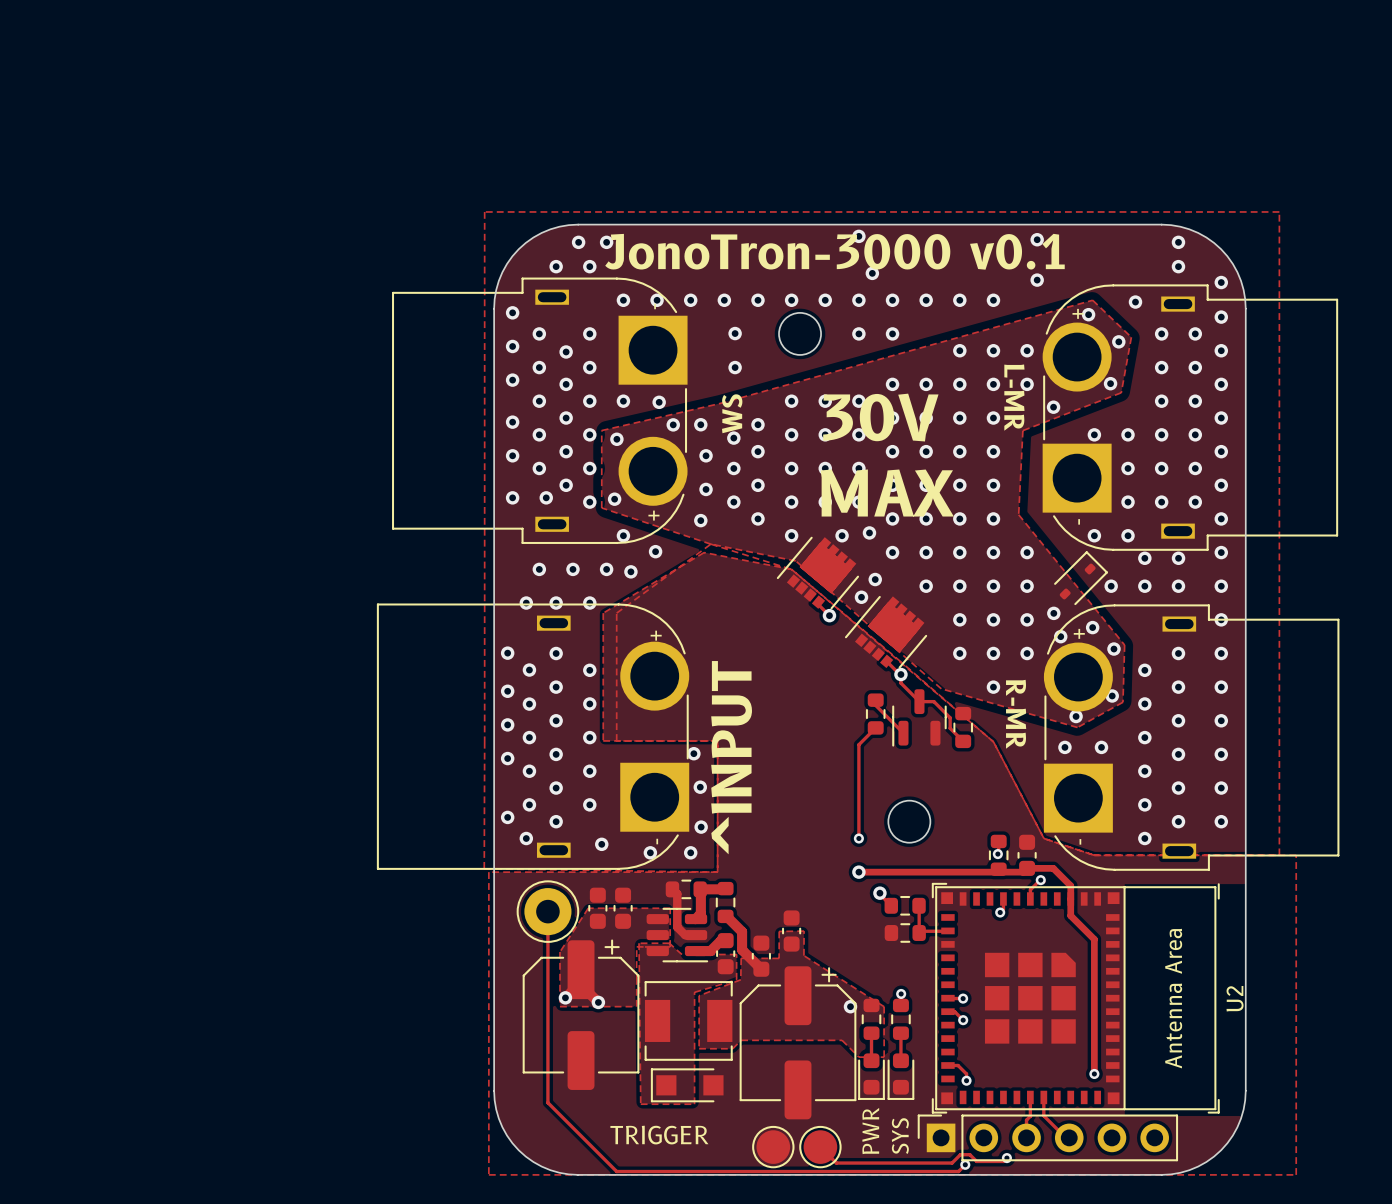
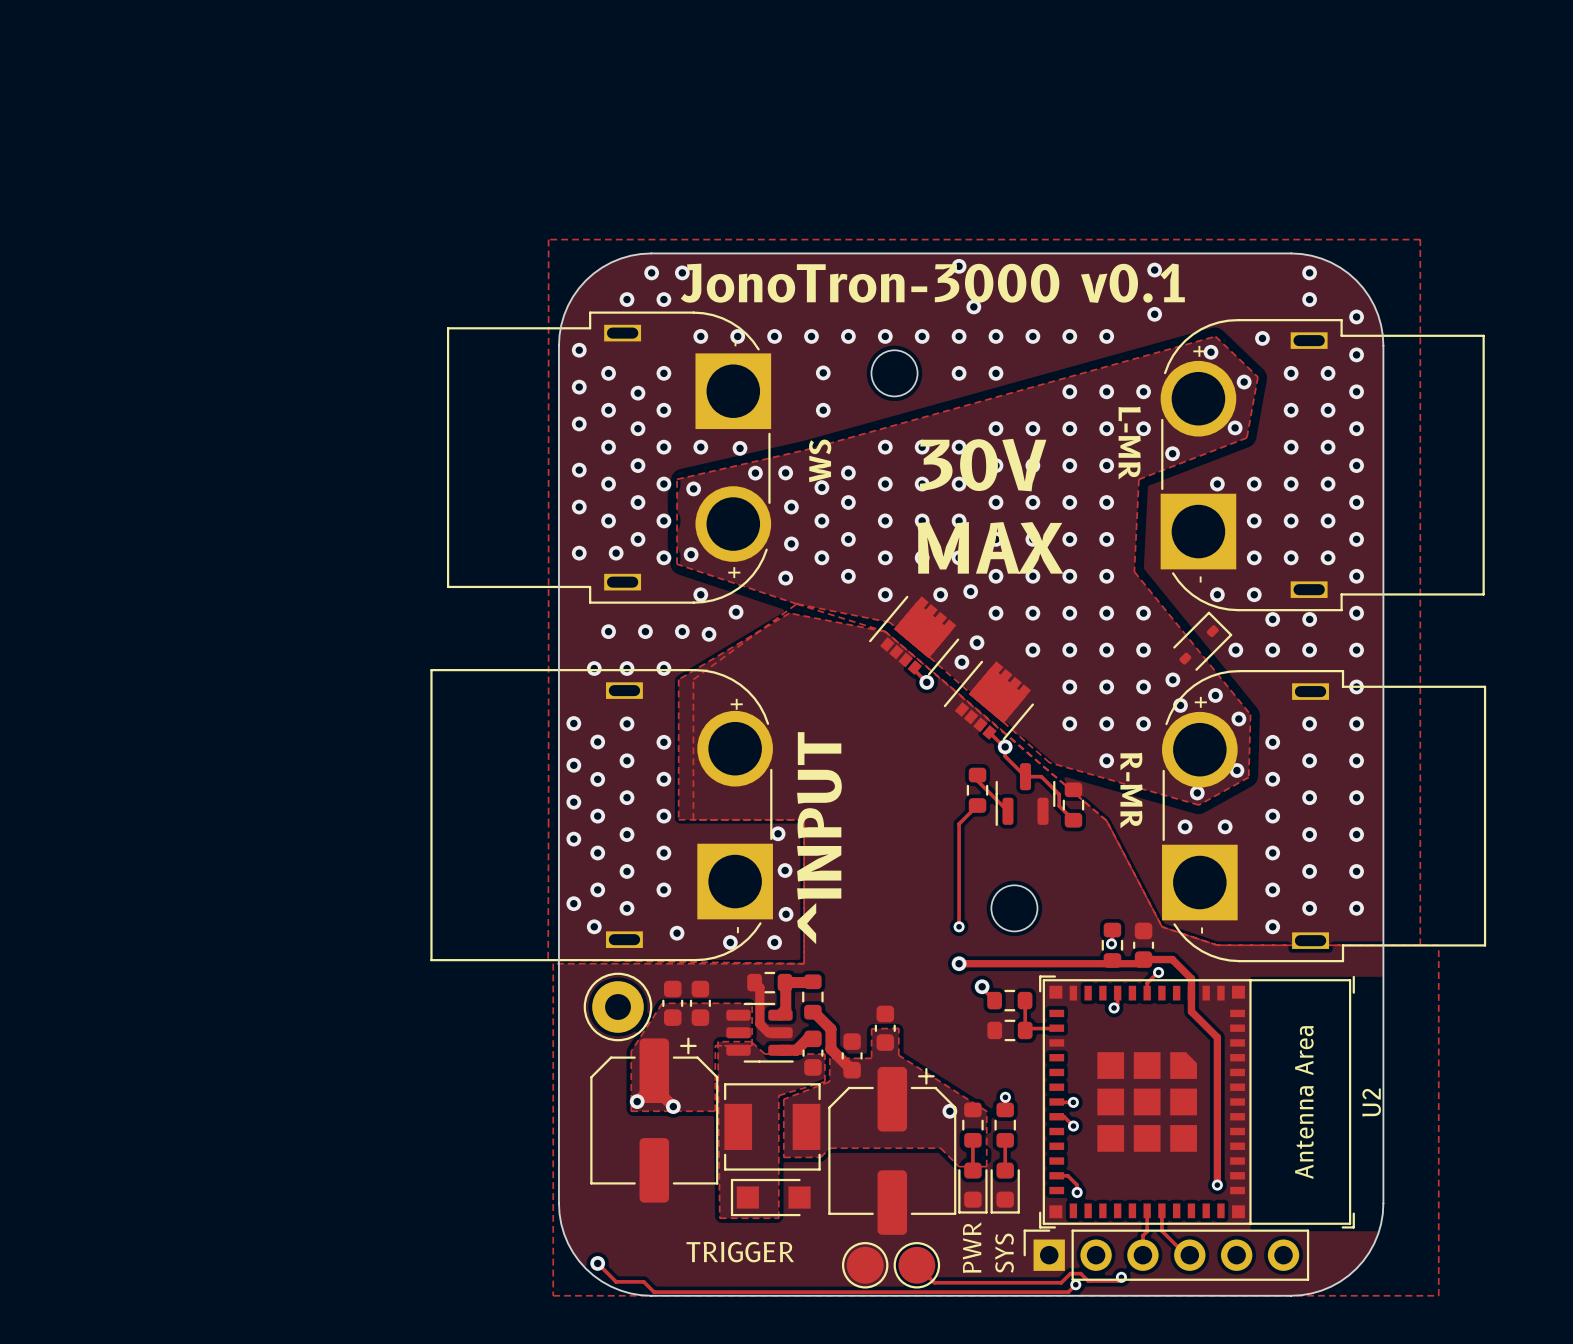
track: (547, 911) (547, 1102) (616, 1171) -> (597, 1263) (616, 1281) (643, 1281) (654, 1292) (693, 1292)
via: none -> (597, 1263)

